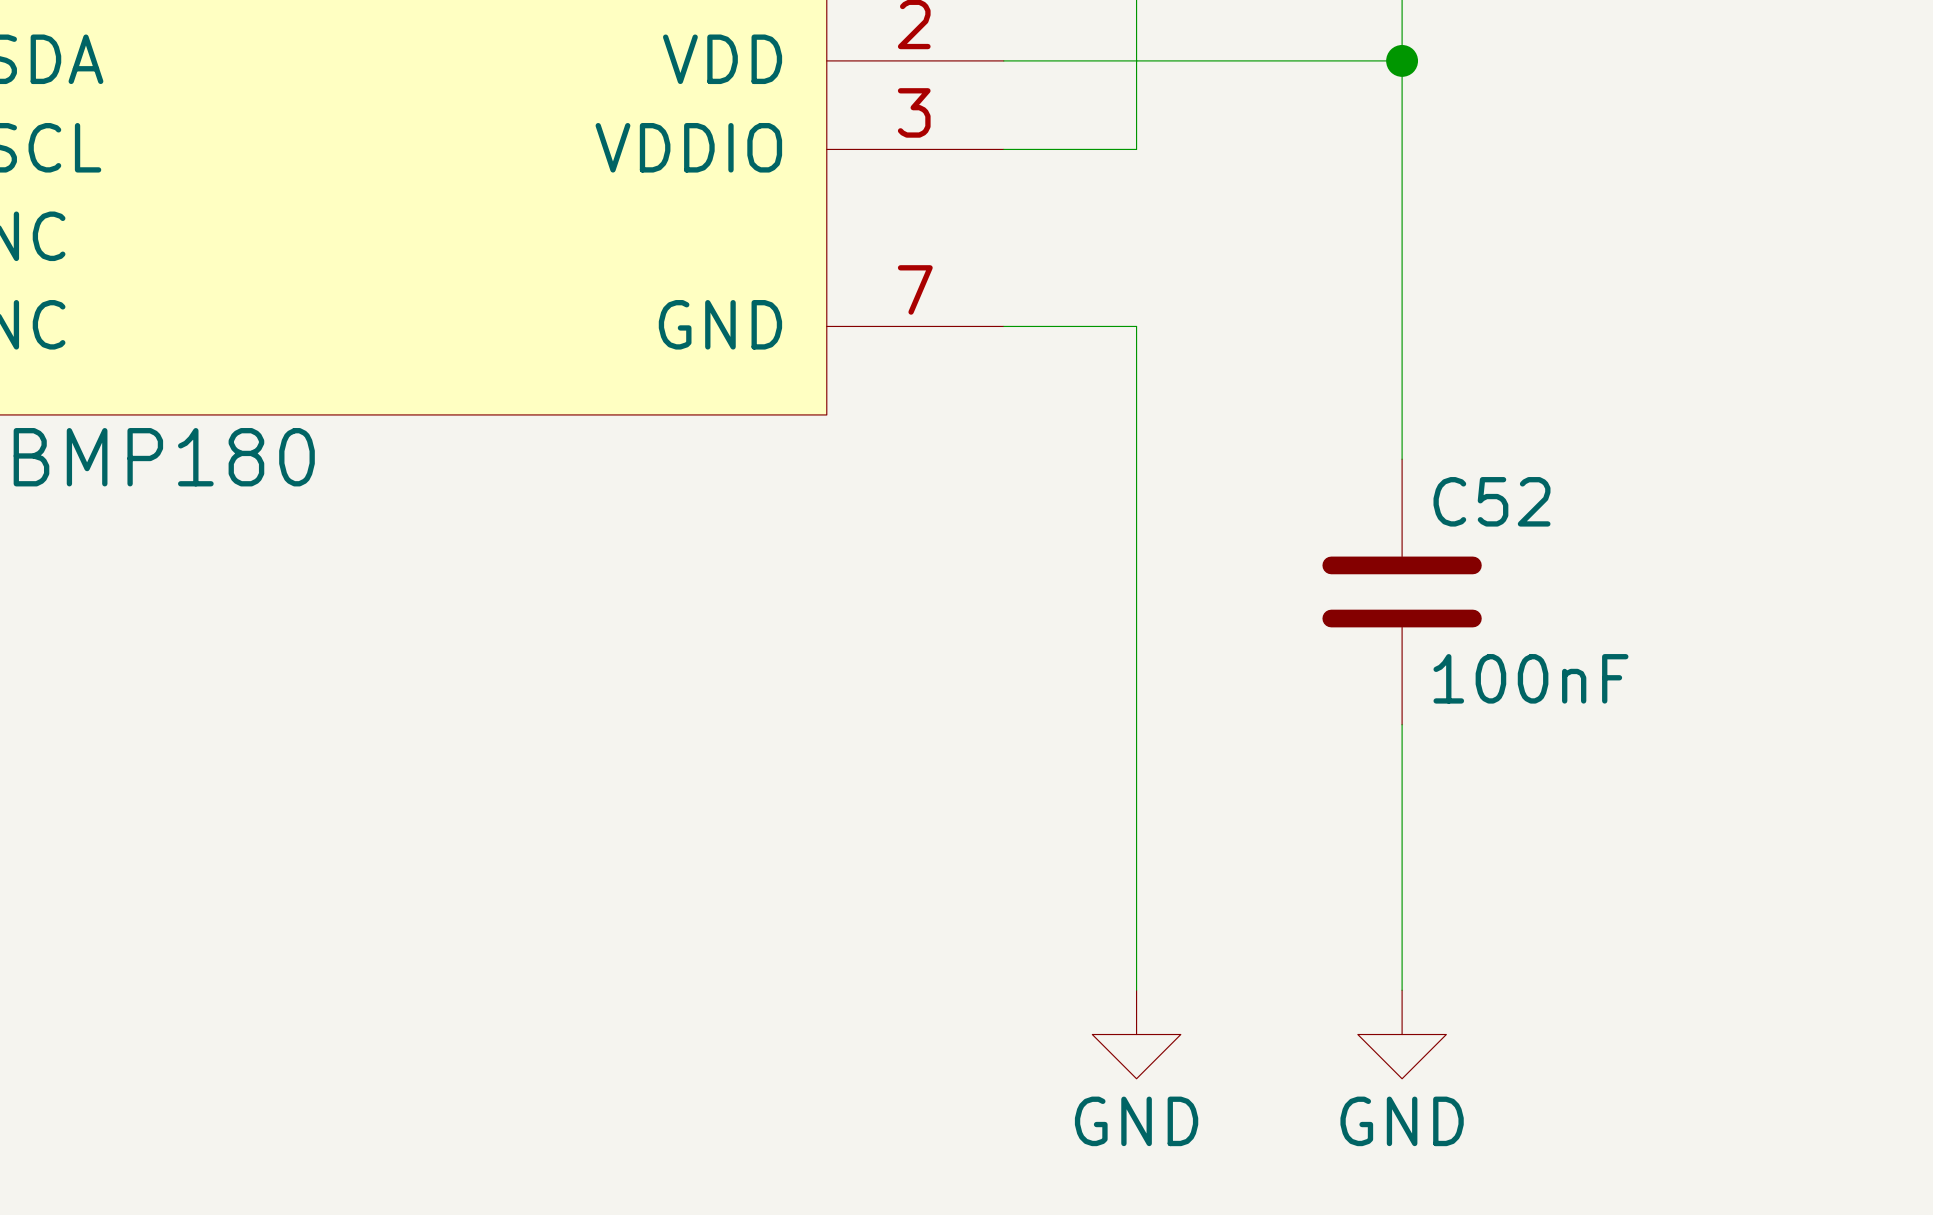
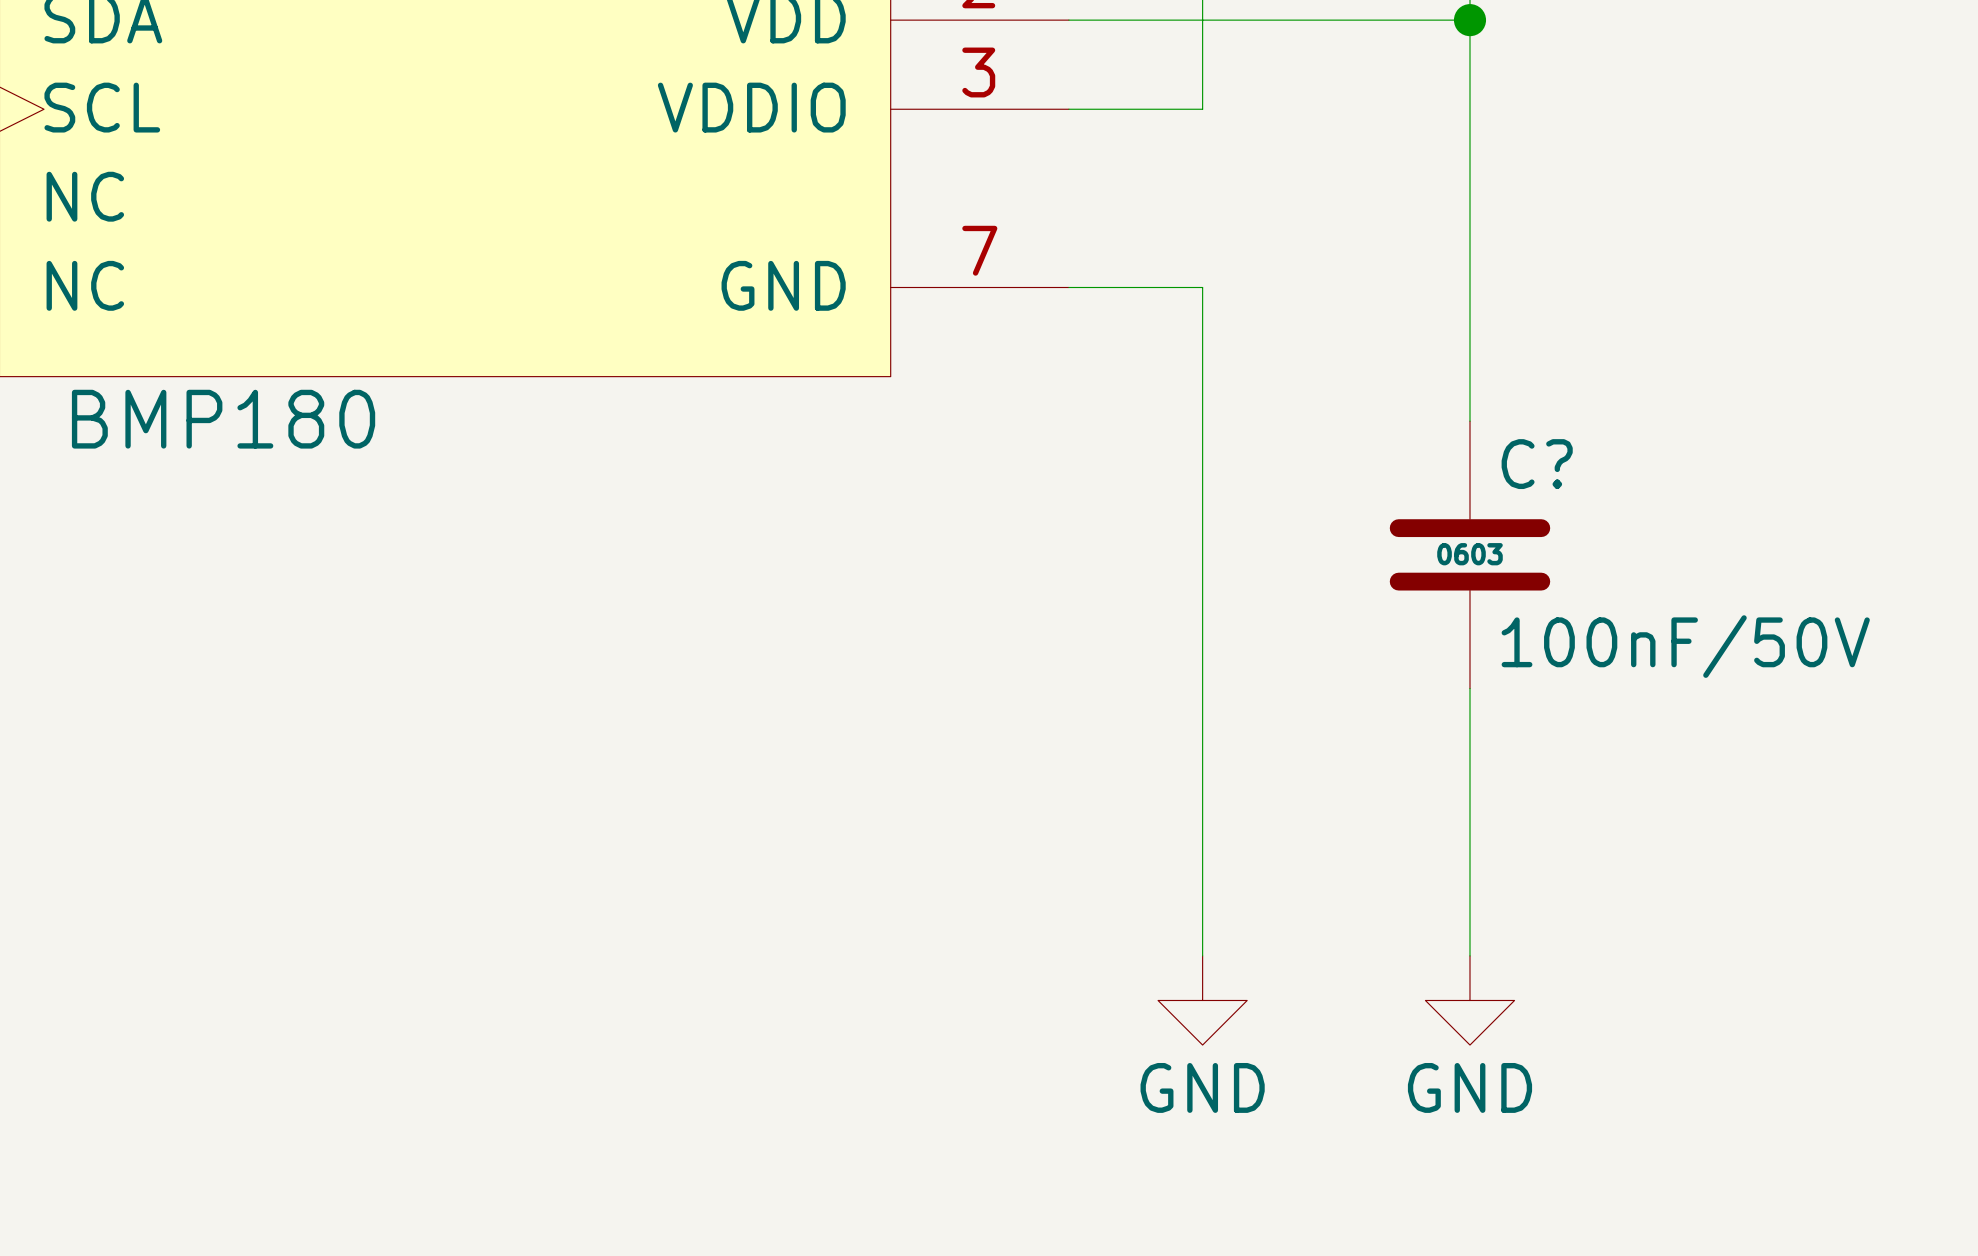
C52 name: C52 (1491, 501) -> C? (1537, 464)
C52 text: none -> 0603 (1469, 554)
C52 value: 100nF (1530, 678) -> 100nF/50V (1685, 646)

